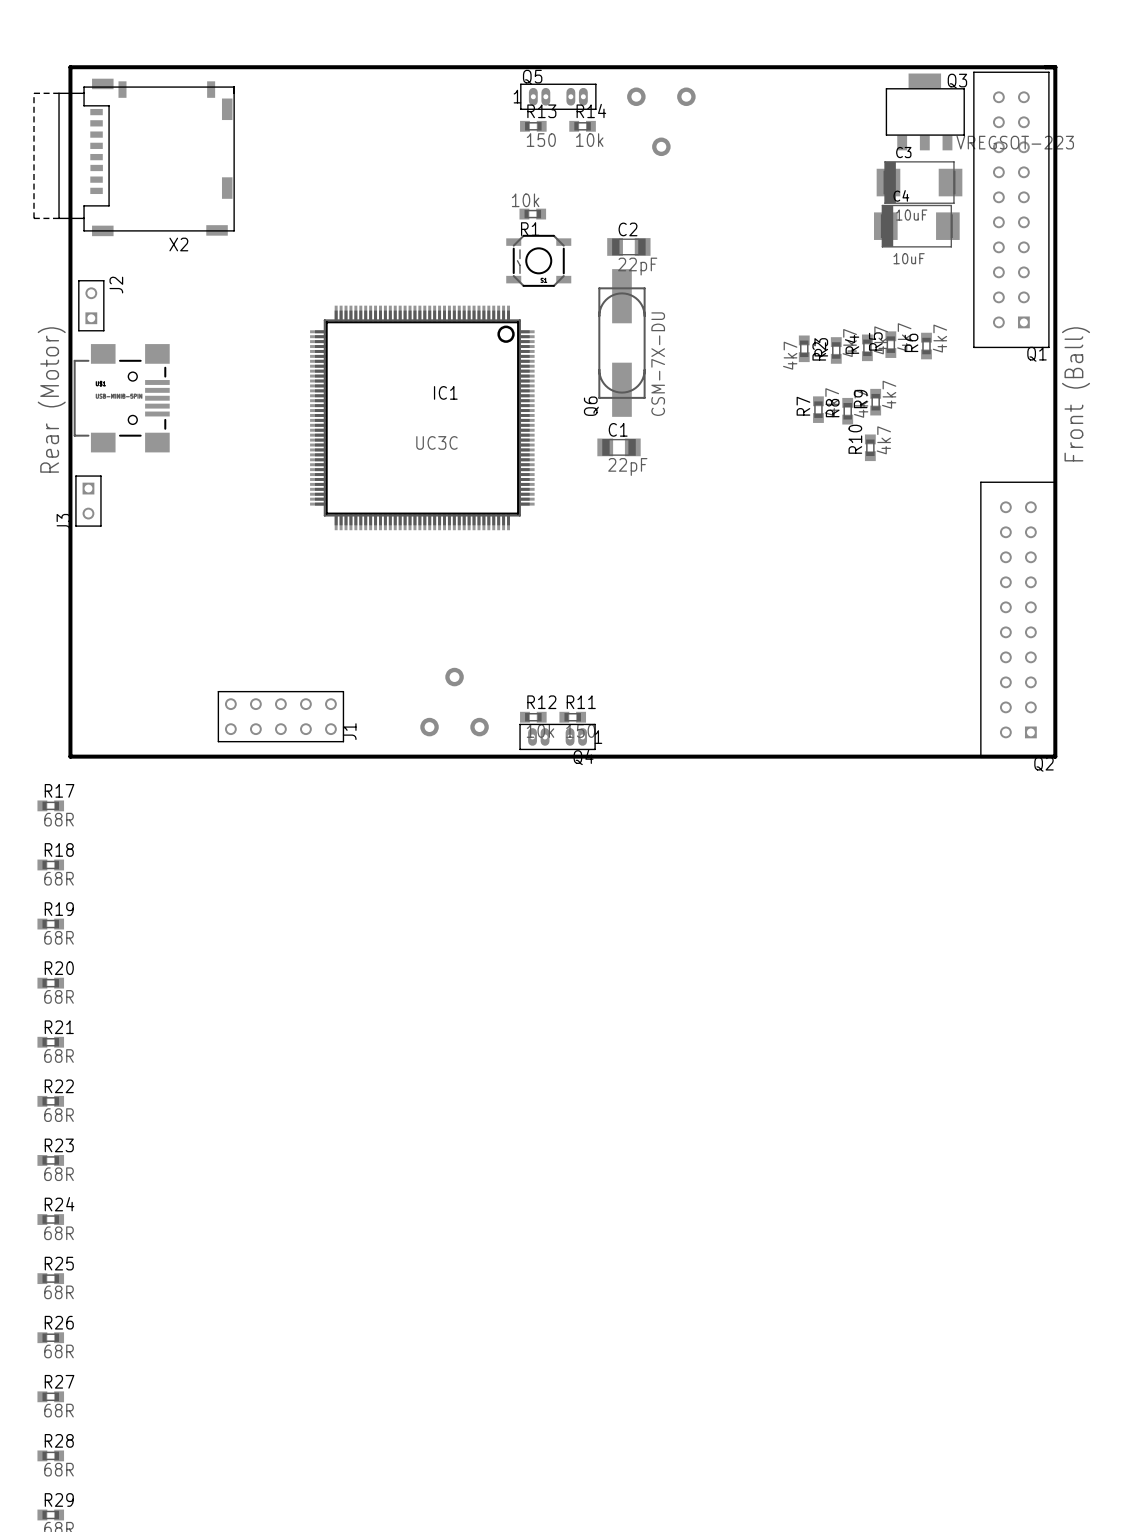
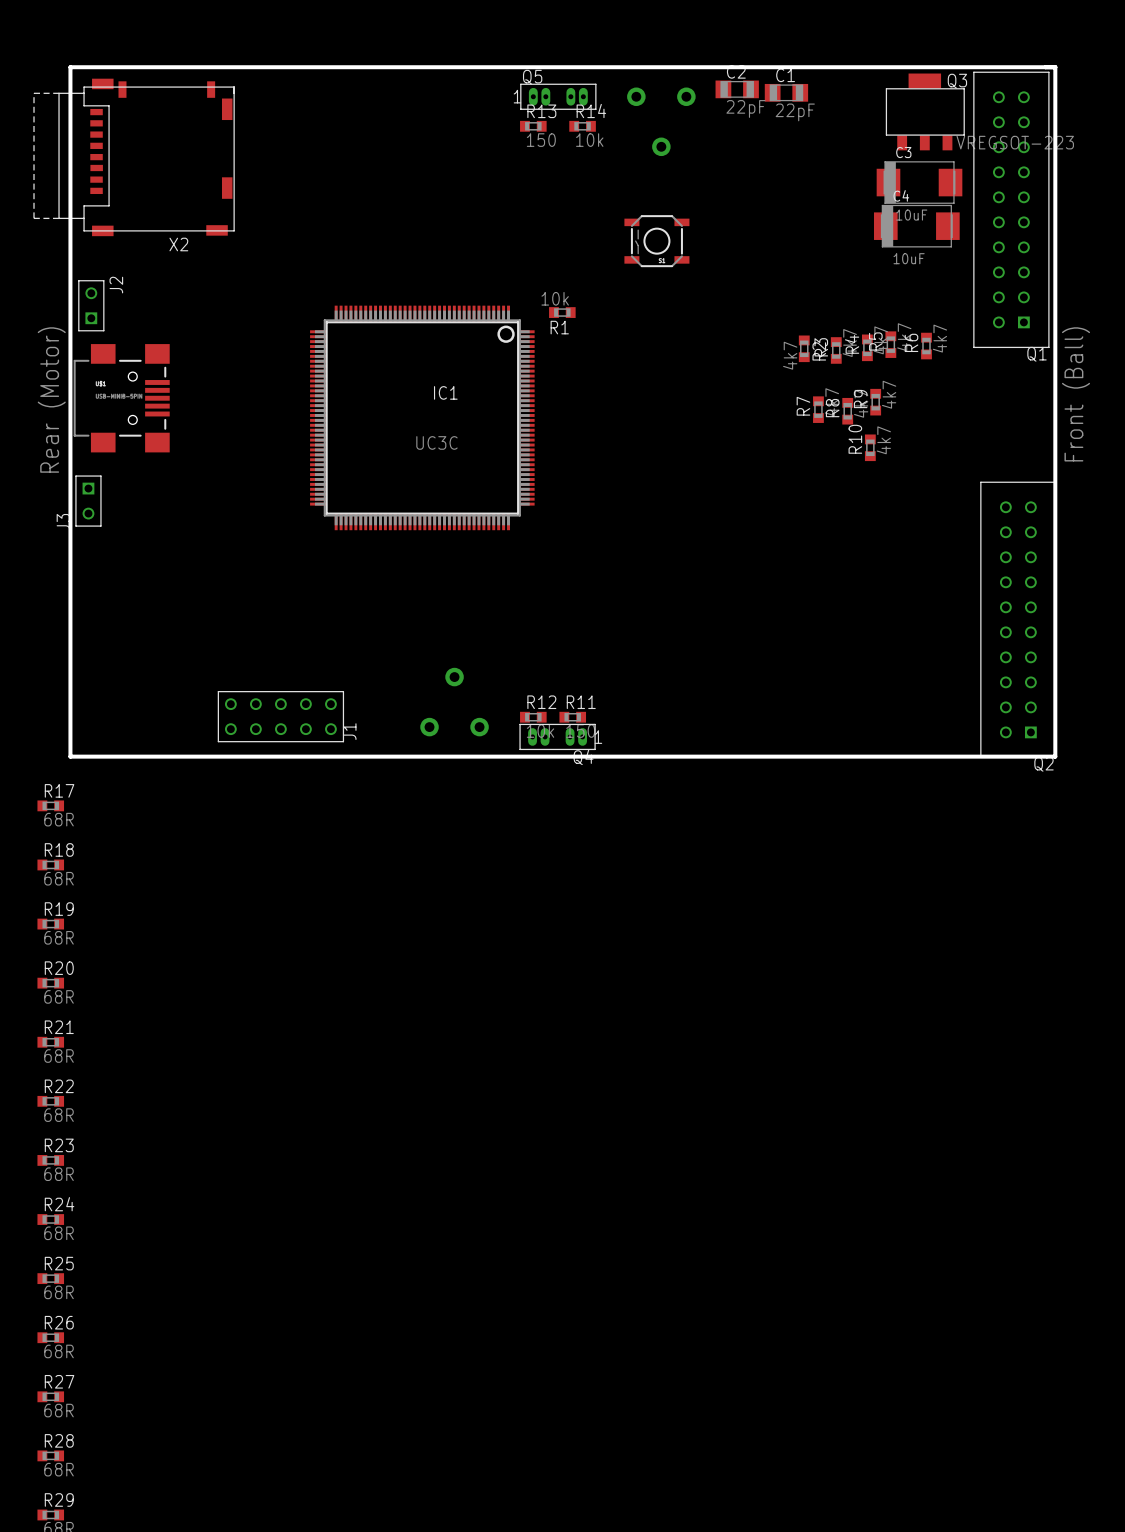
R1 position: (532, 214) -> (562, 312)
C2 position: (628, 246) -> (737, 89)
part position: (538, 260) -> (656, 241)
Q6: CSM-7X-DU (621, 342) -> none
C1 position: (619, 447) -> (786, 92)

